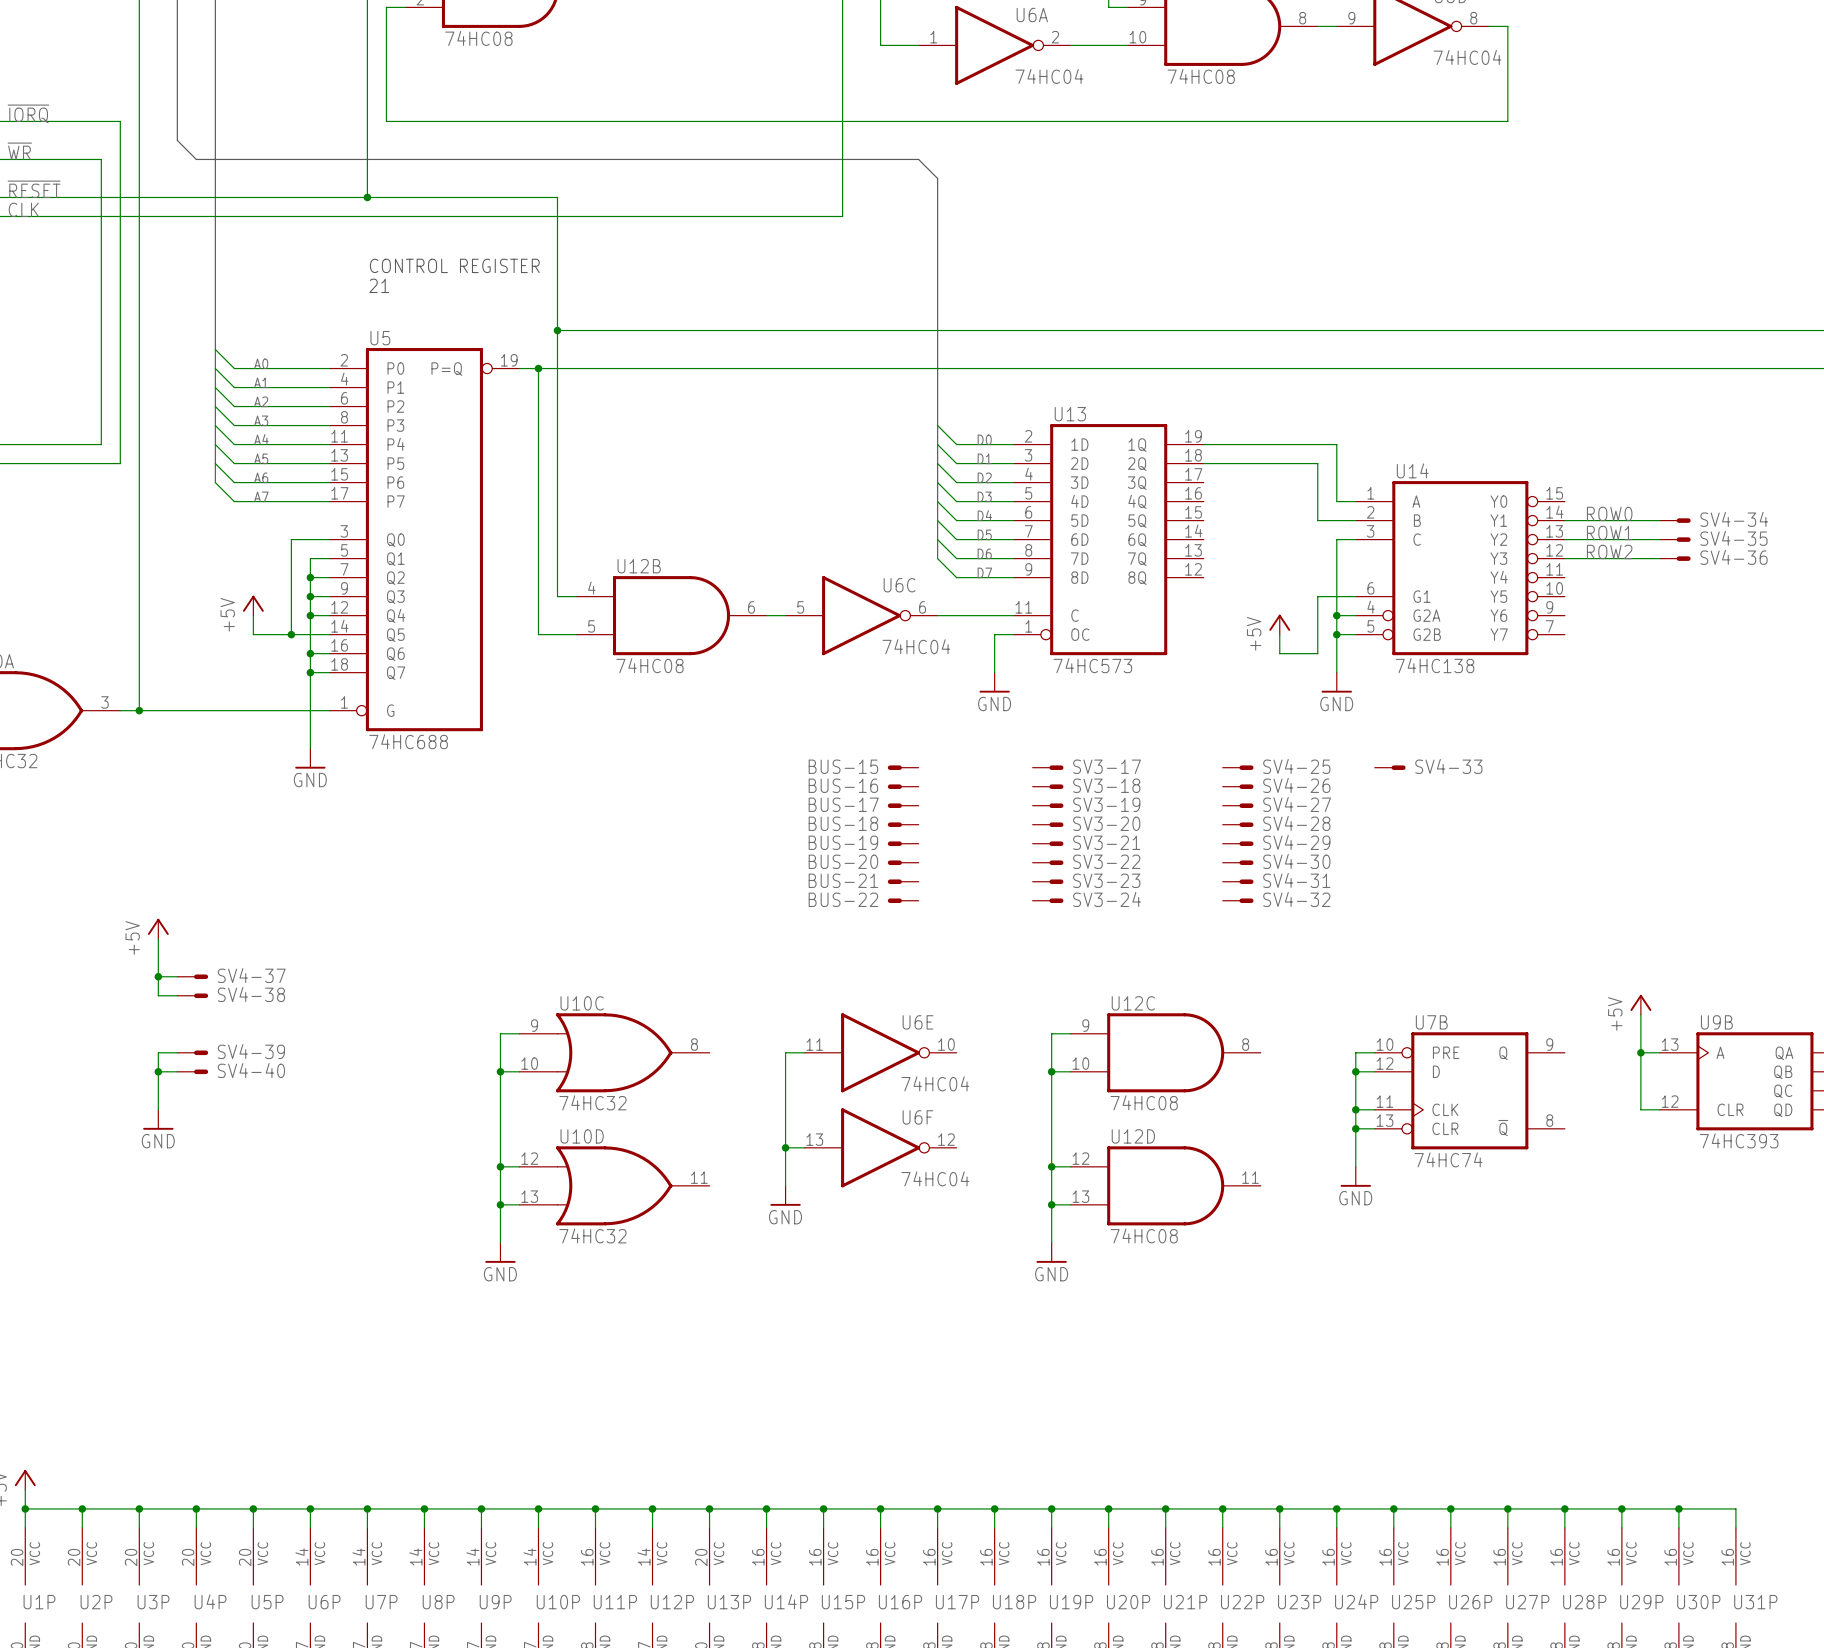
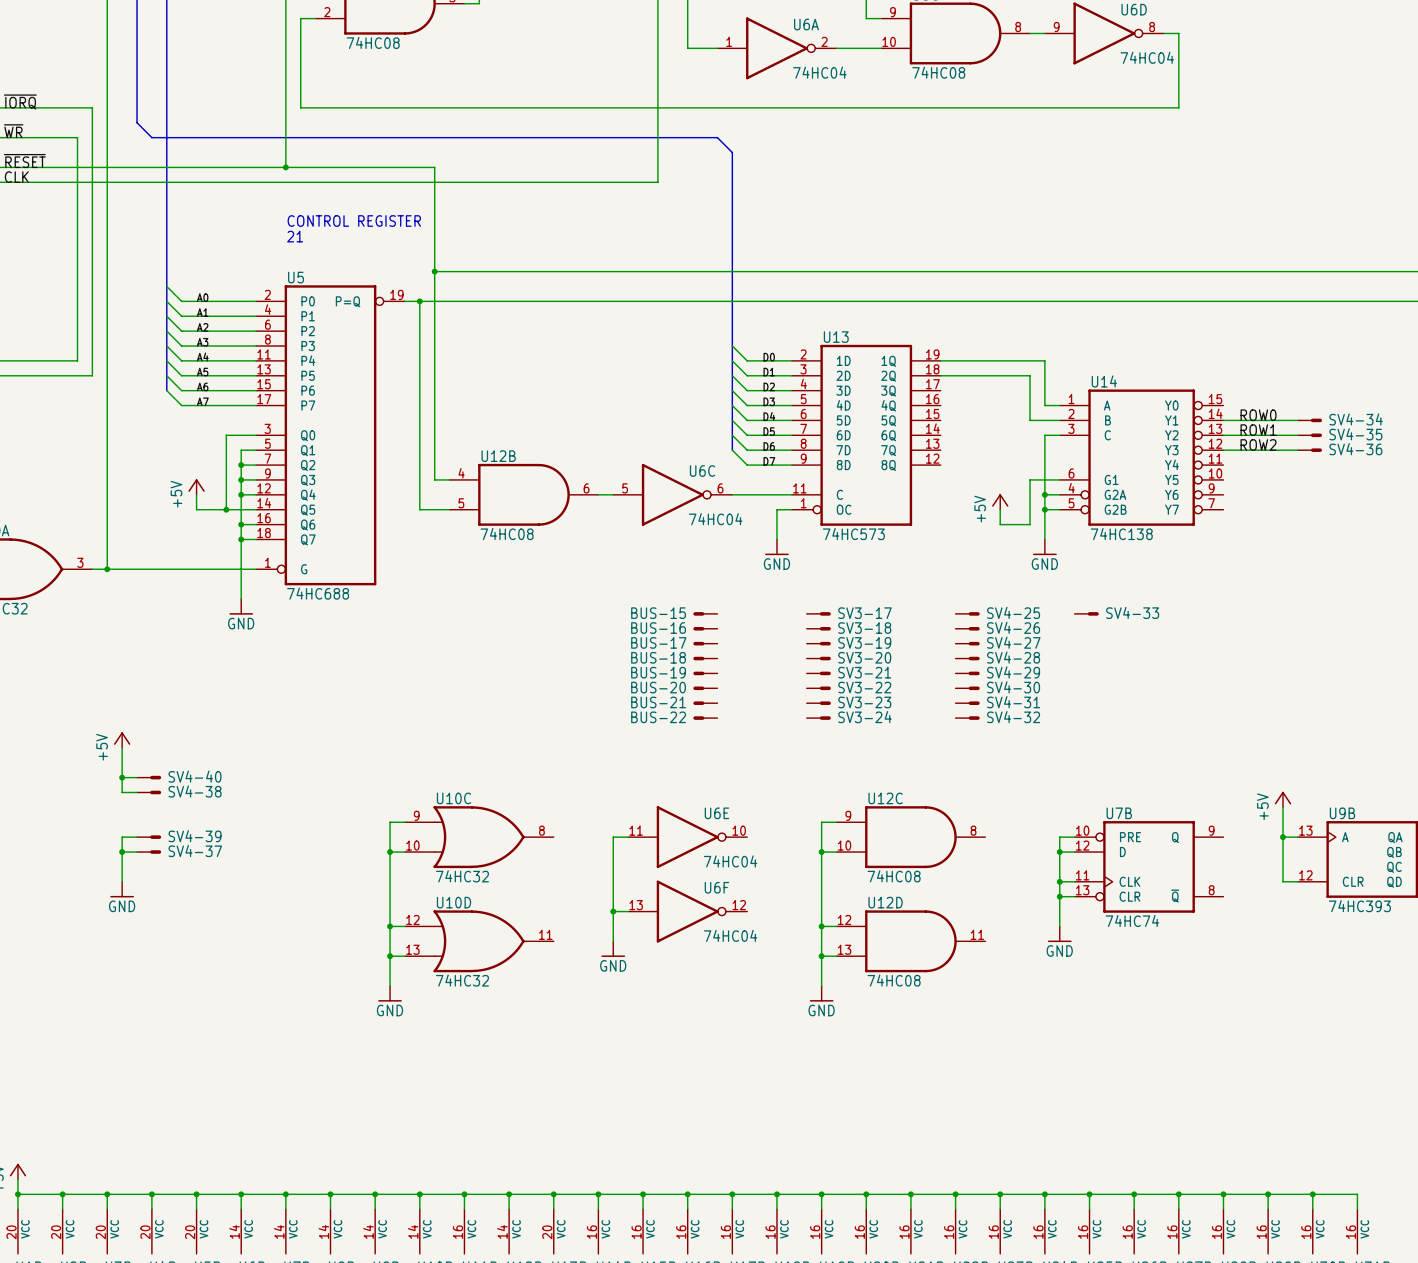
SV4-37 name: SV4-37 (251, 975) -> SV4-40 (195, 776)
SV4-40 name: SV4-40 (251, 1070) -> SV4-37 (195, 851)

